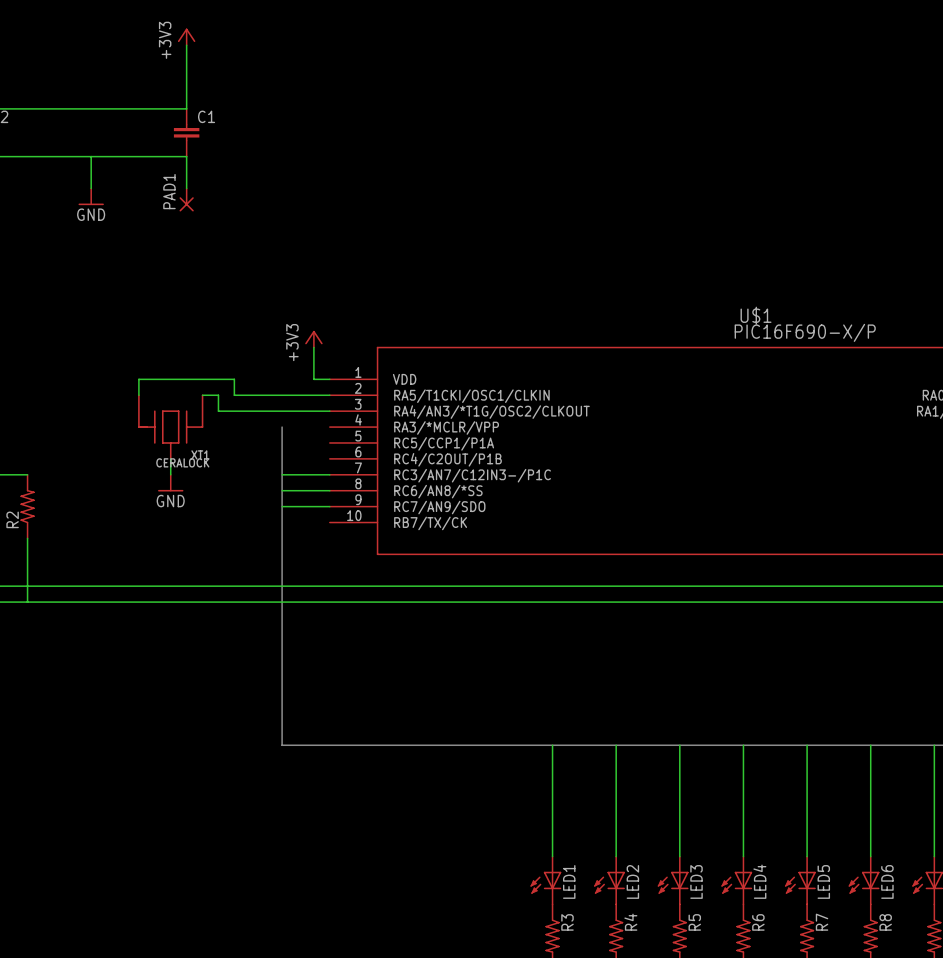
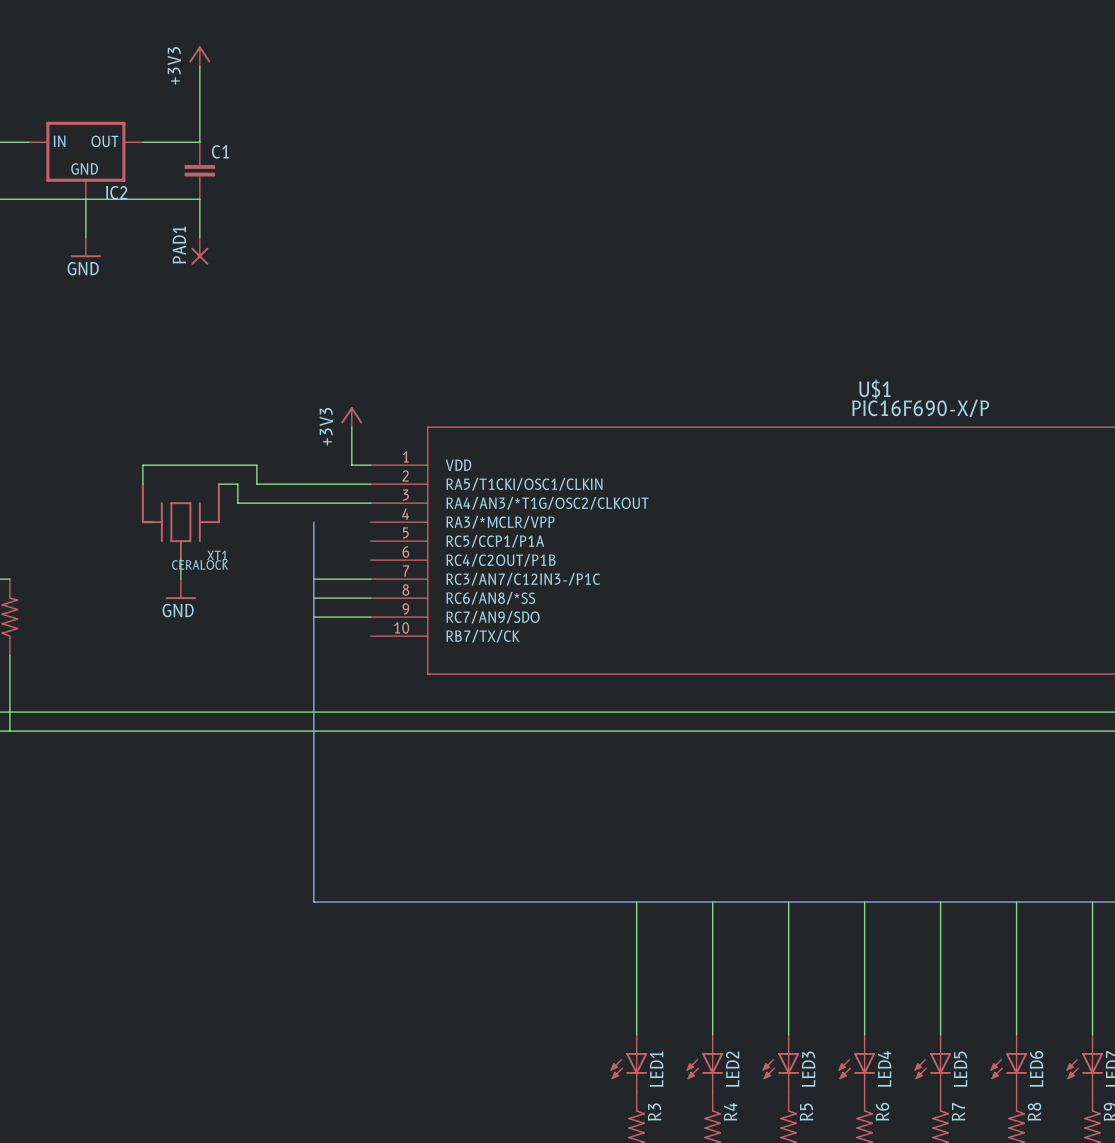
wire: (43, 108) (138, 108) -> none
IC2: none -> (85, 160)

